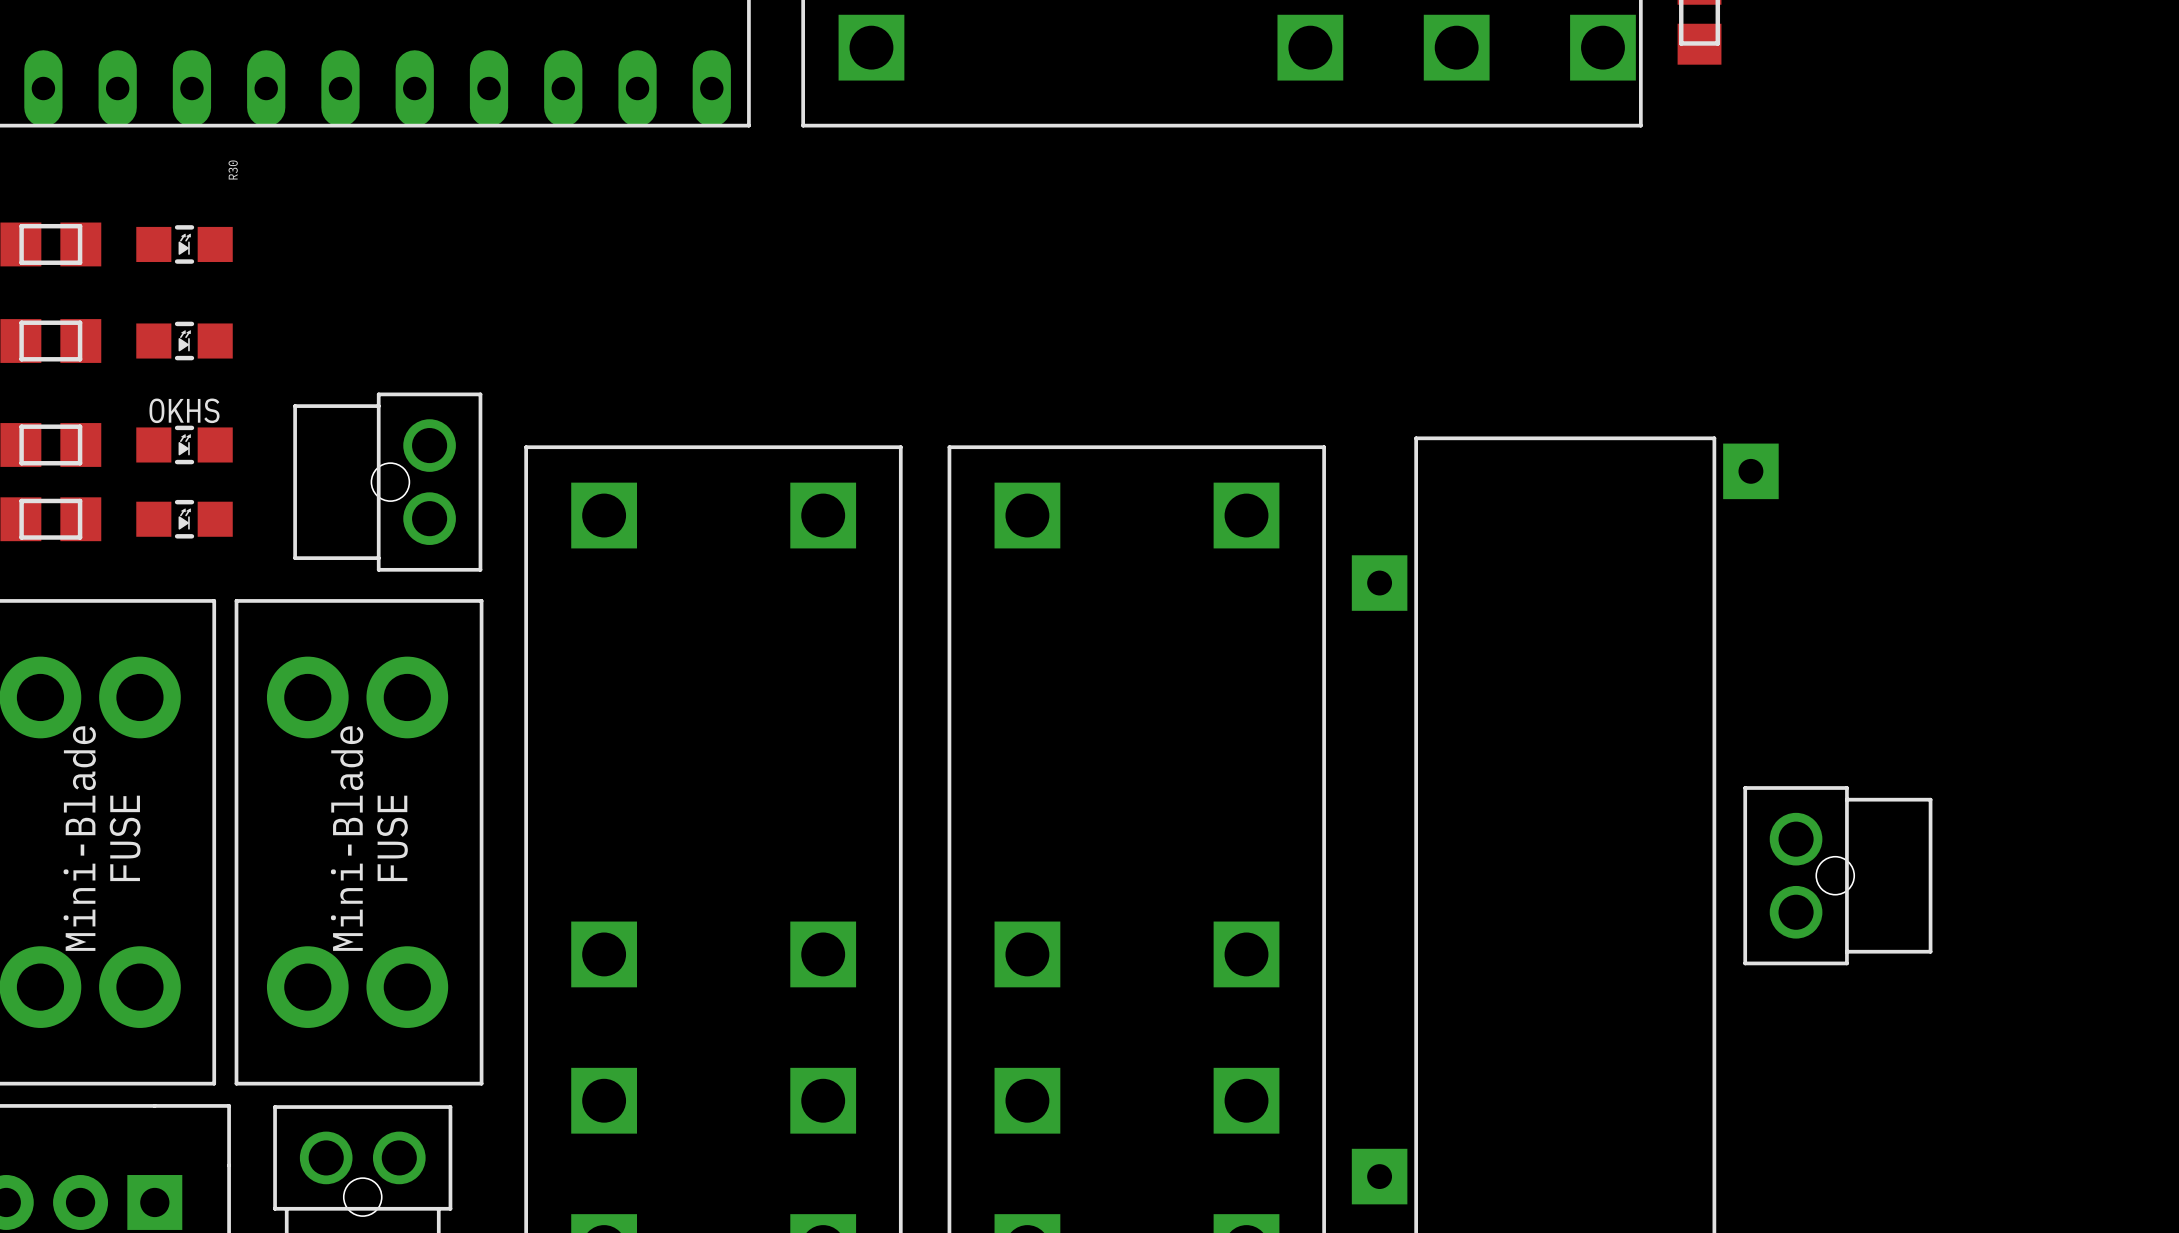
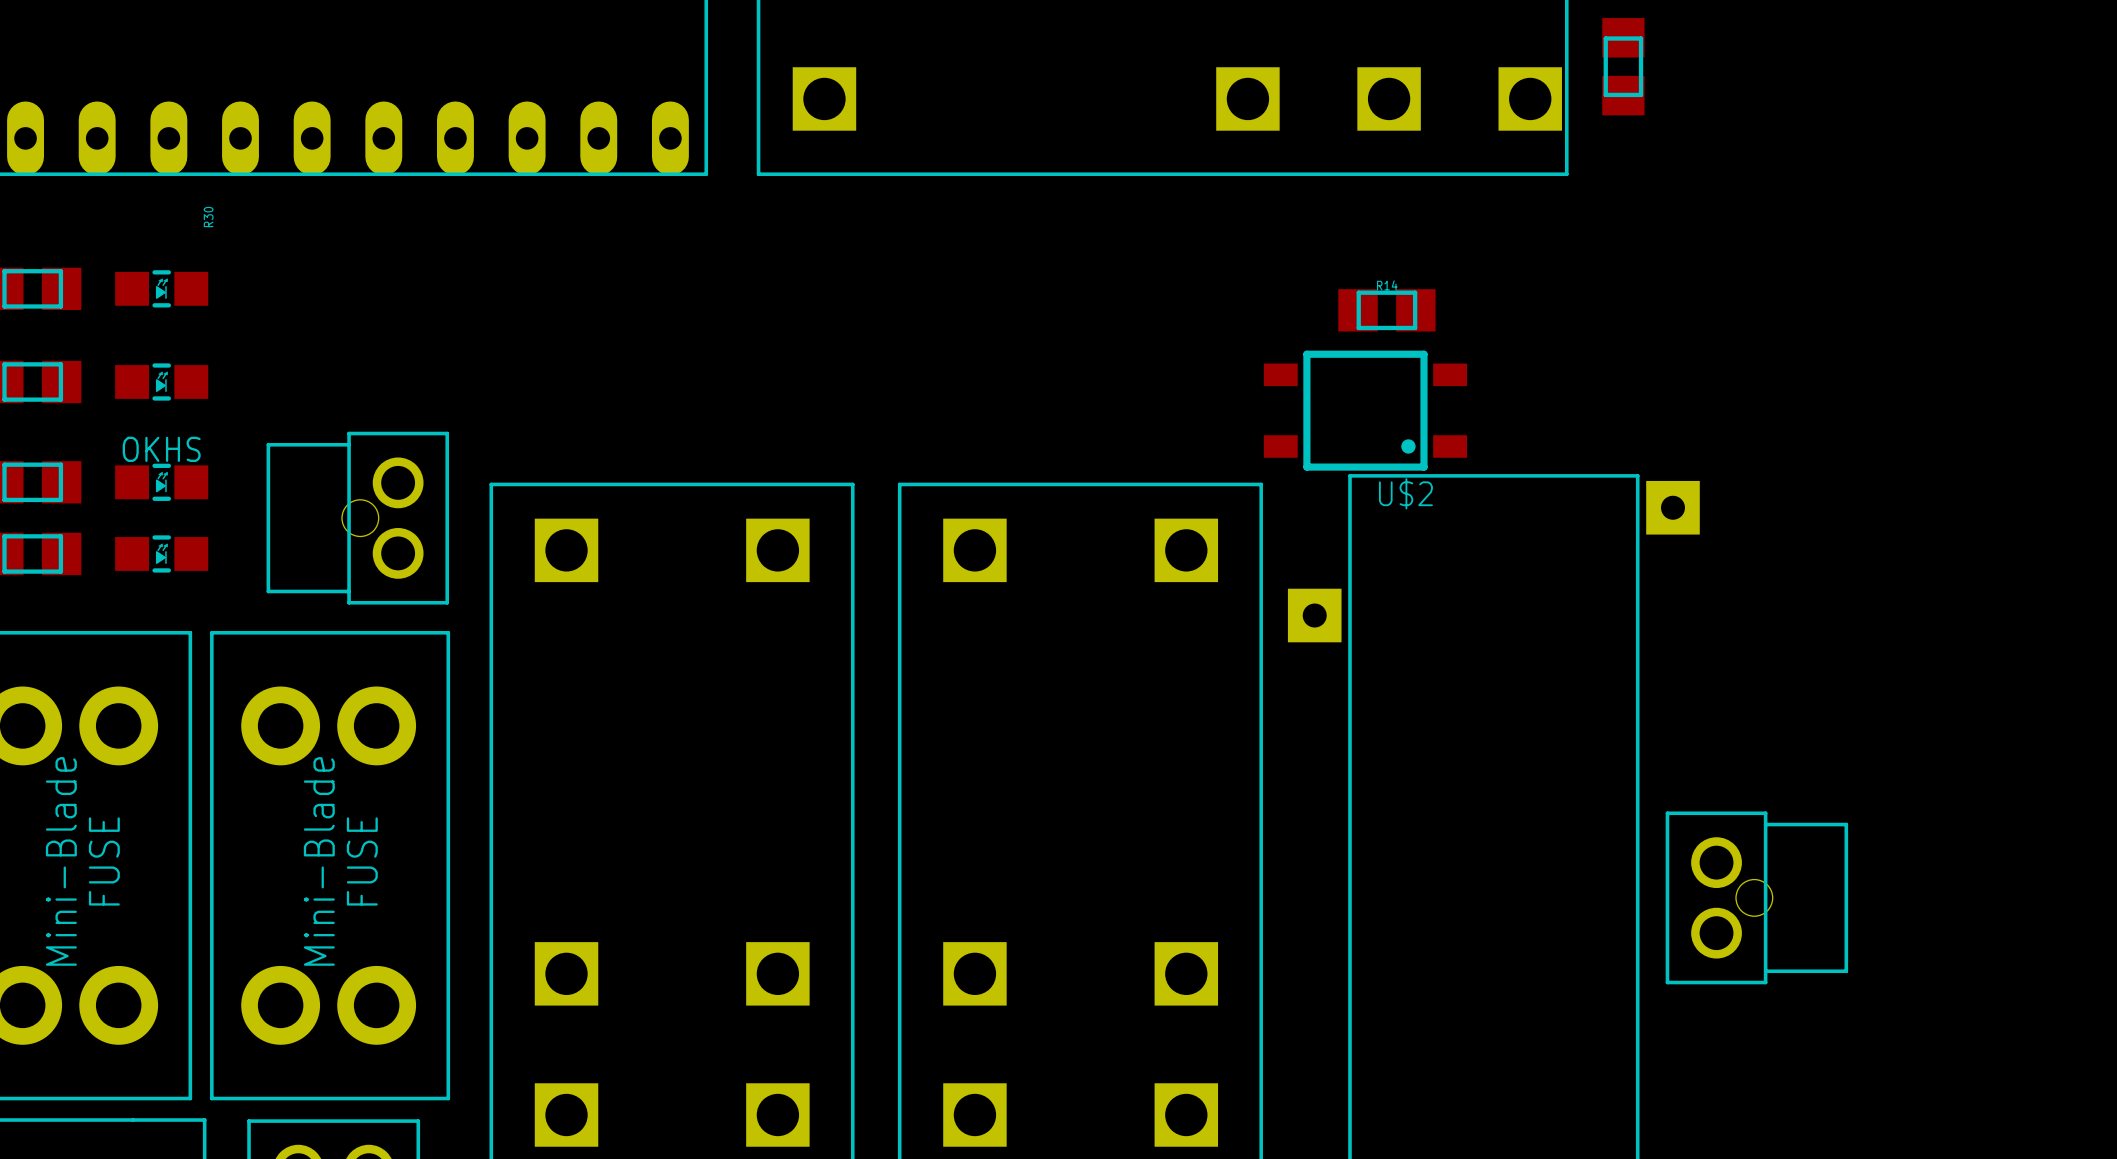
R14: none -> (1386, 310)
U$2: none -> (1365, 410)

